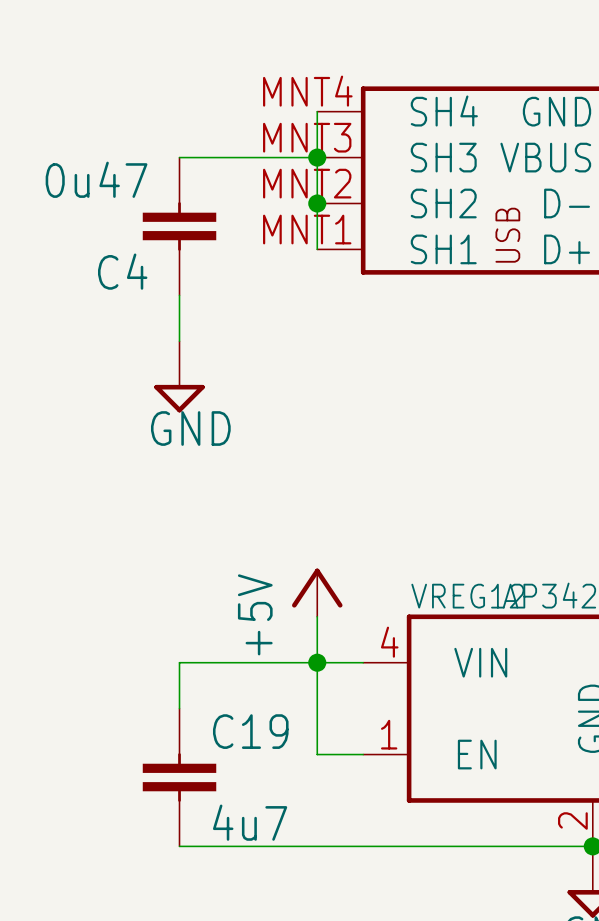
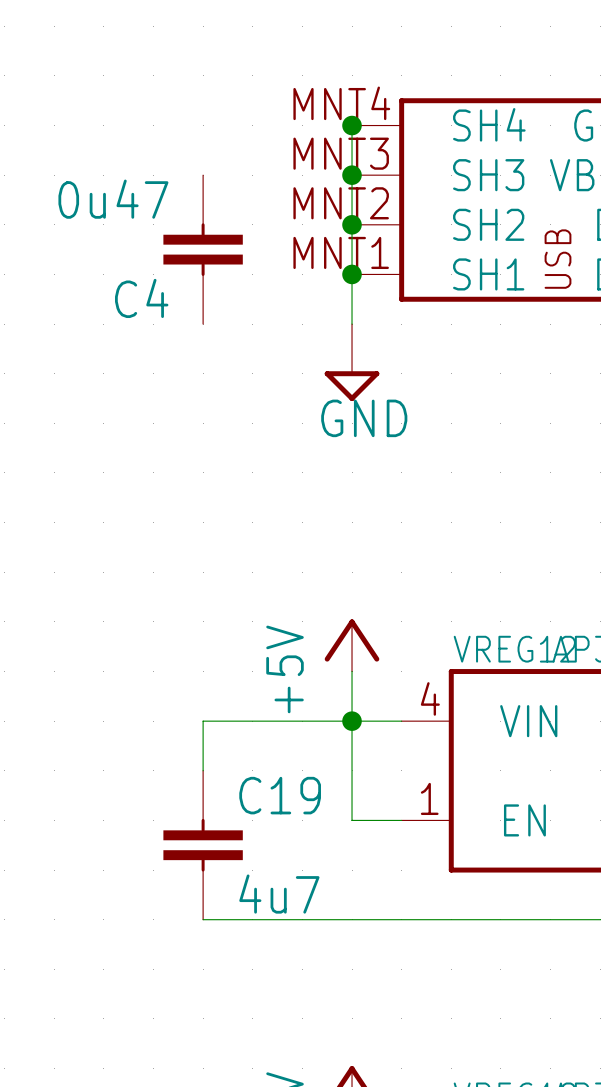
junction: none -> (352, 125)
wire: (179, 157) (317, 157) -> none
junction: none -> (352, 274)
wire: (179, 295) (179, 341) -> (352, 274) (352, 324)
power symbol position: GND (179, 376) -> GND (352, 362)

